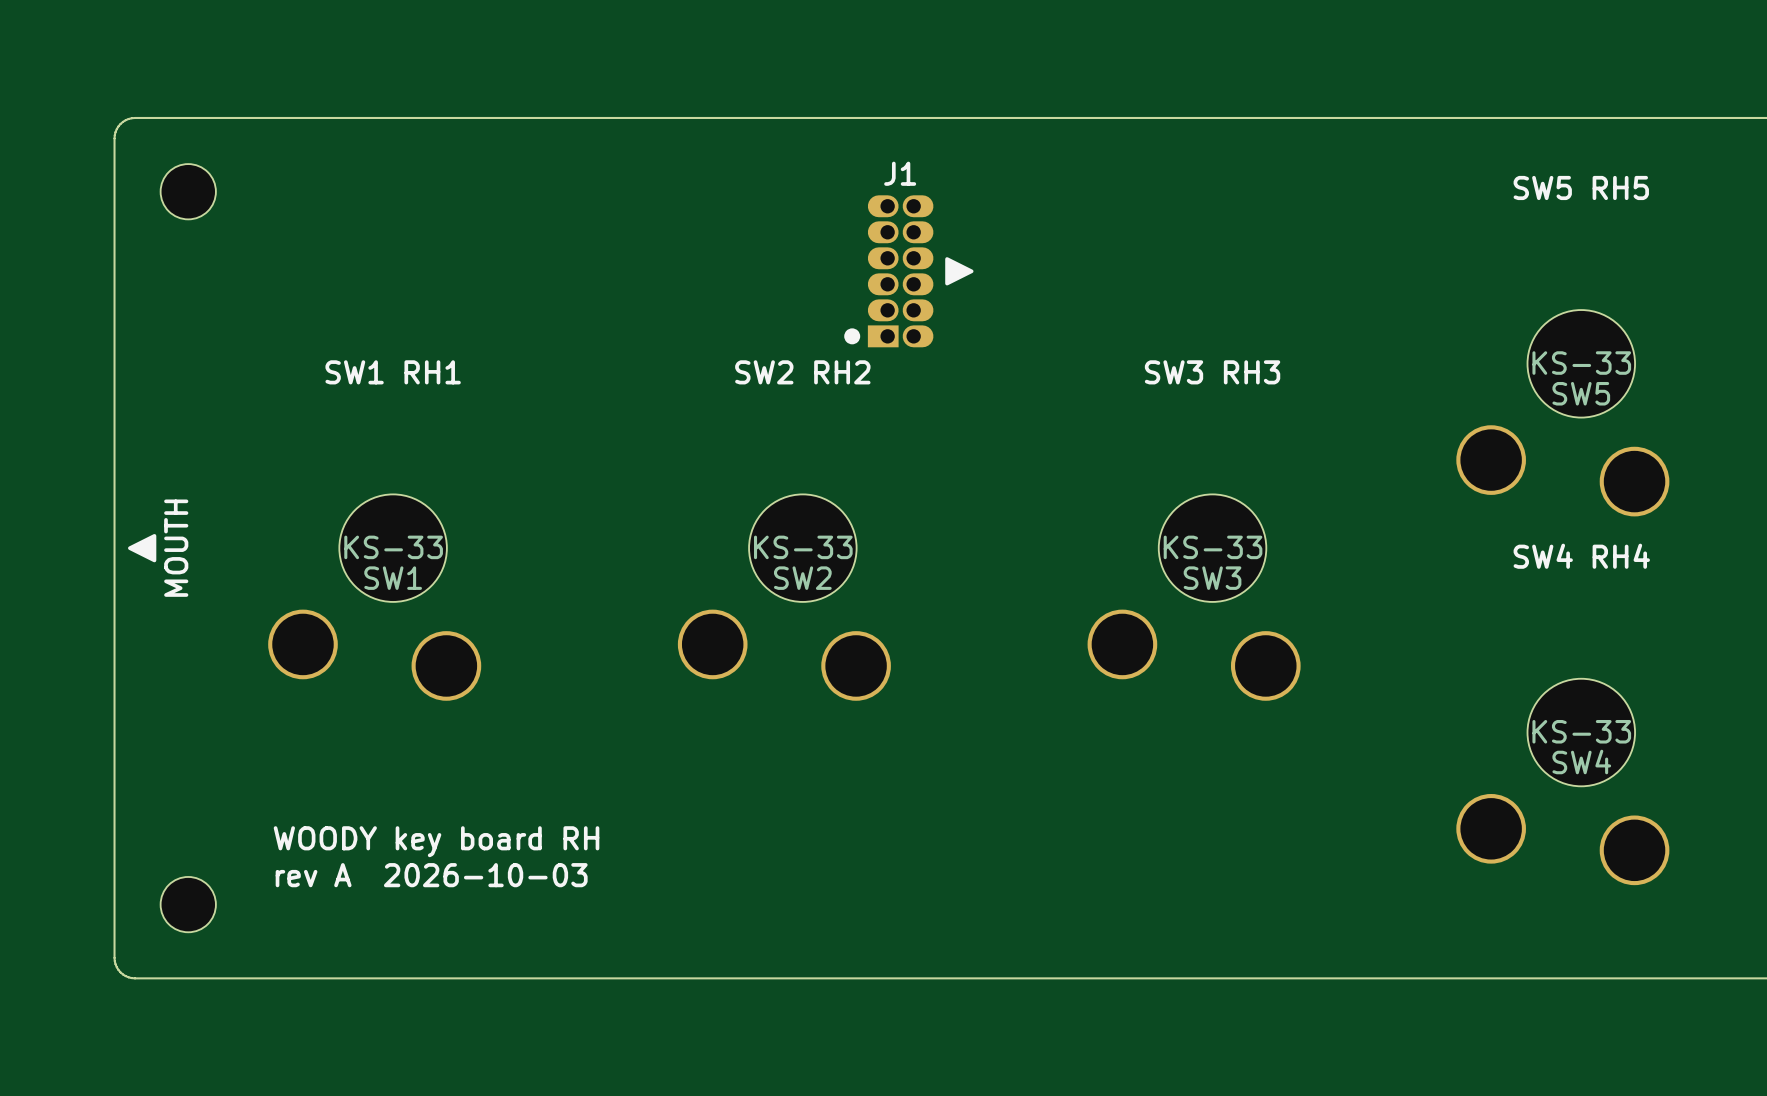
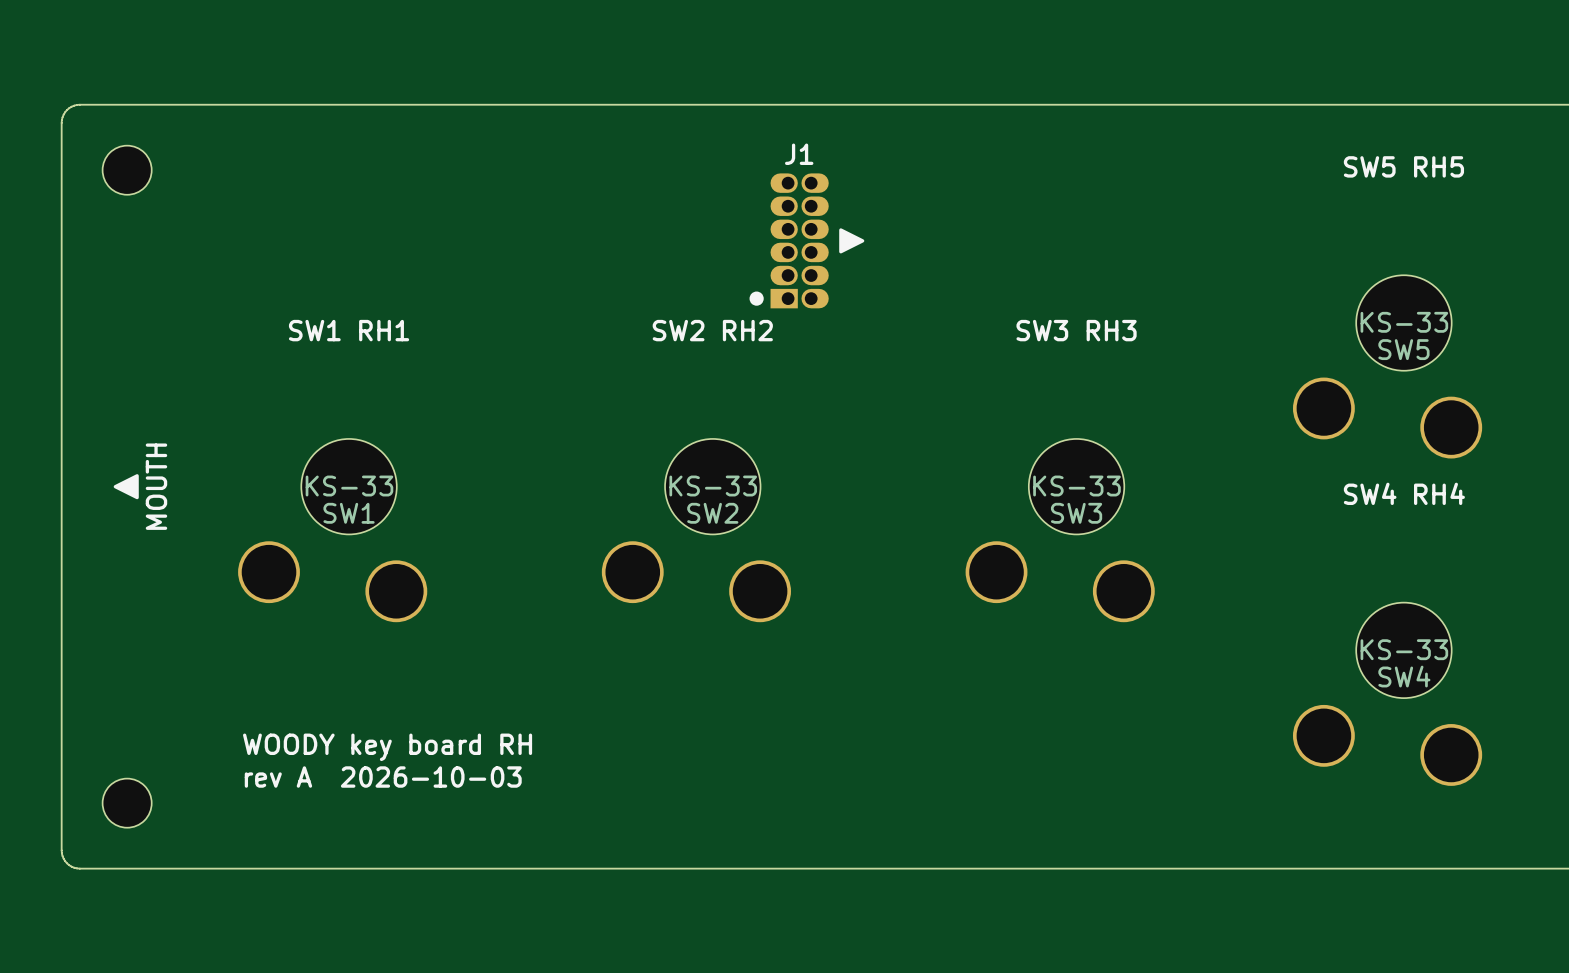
board edge: (135, 117) (120, 123) (114, 138) (114, 957) (120, 972) (135, 978) -> (119, 104) (74, 105) (65, 112) (61, 122) (61, 853) (65, 861) (74, 867) (119, 868)
part position: (188, 191) -> (127, 170)
part position: (188, 904) -> (127, 803)

